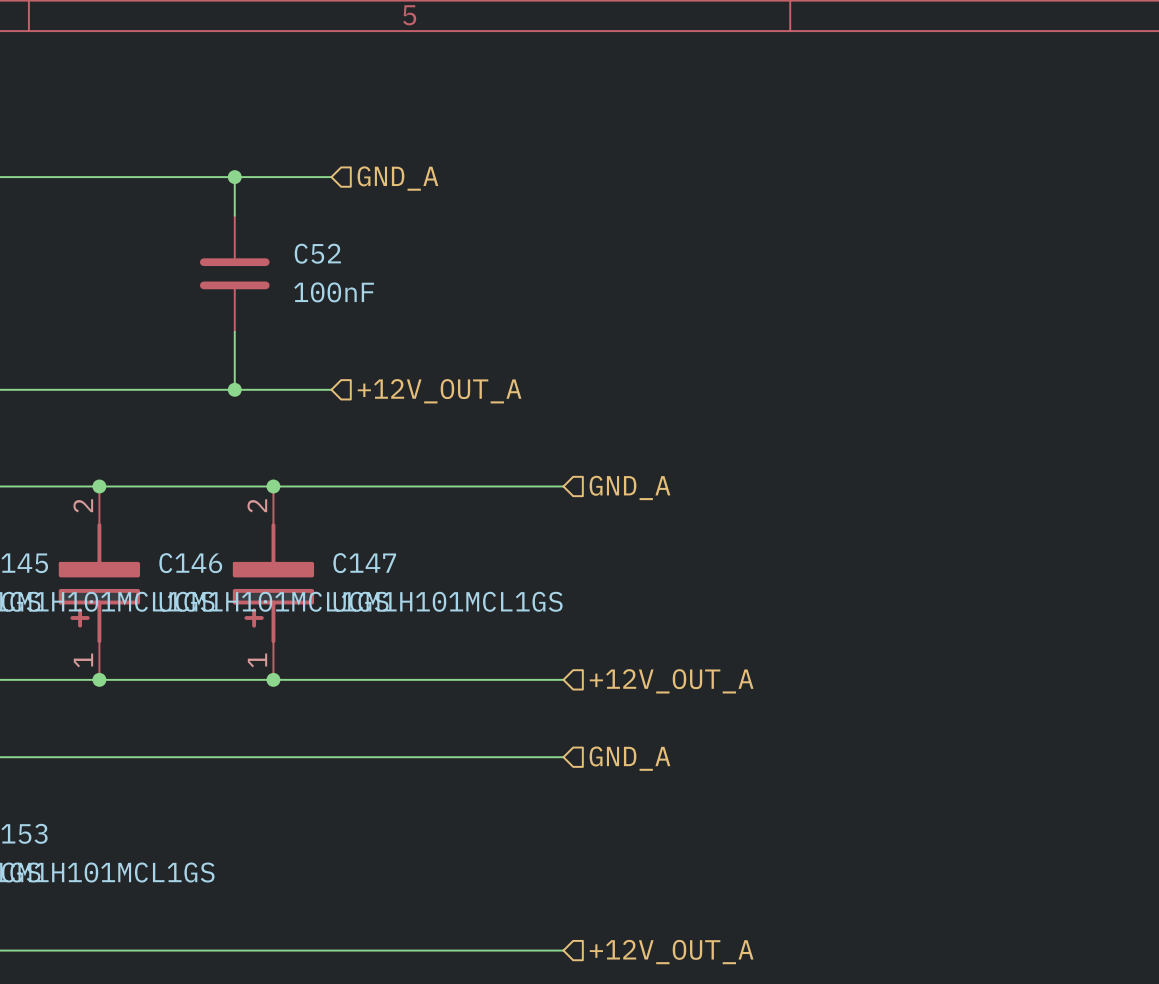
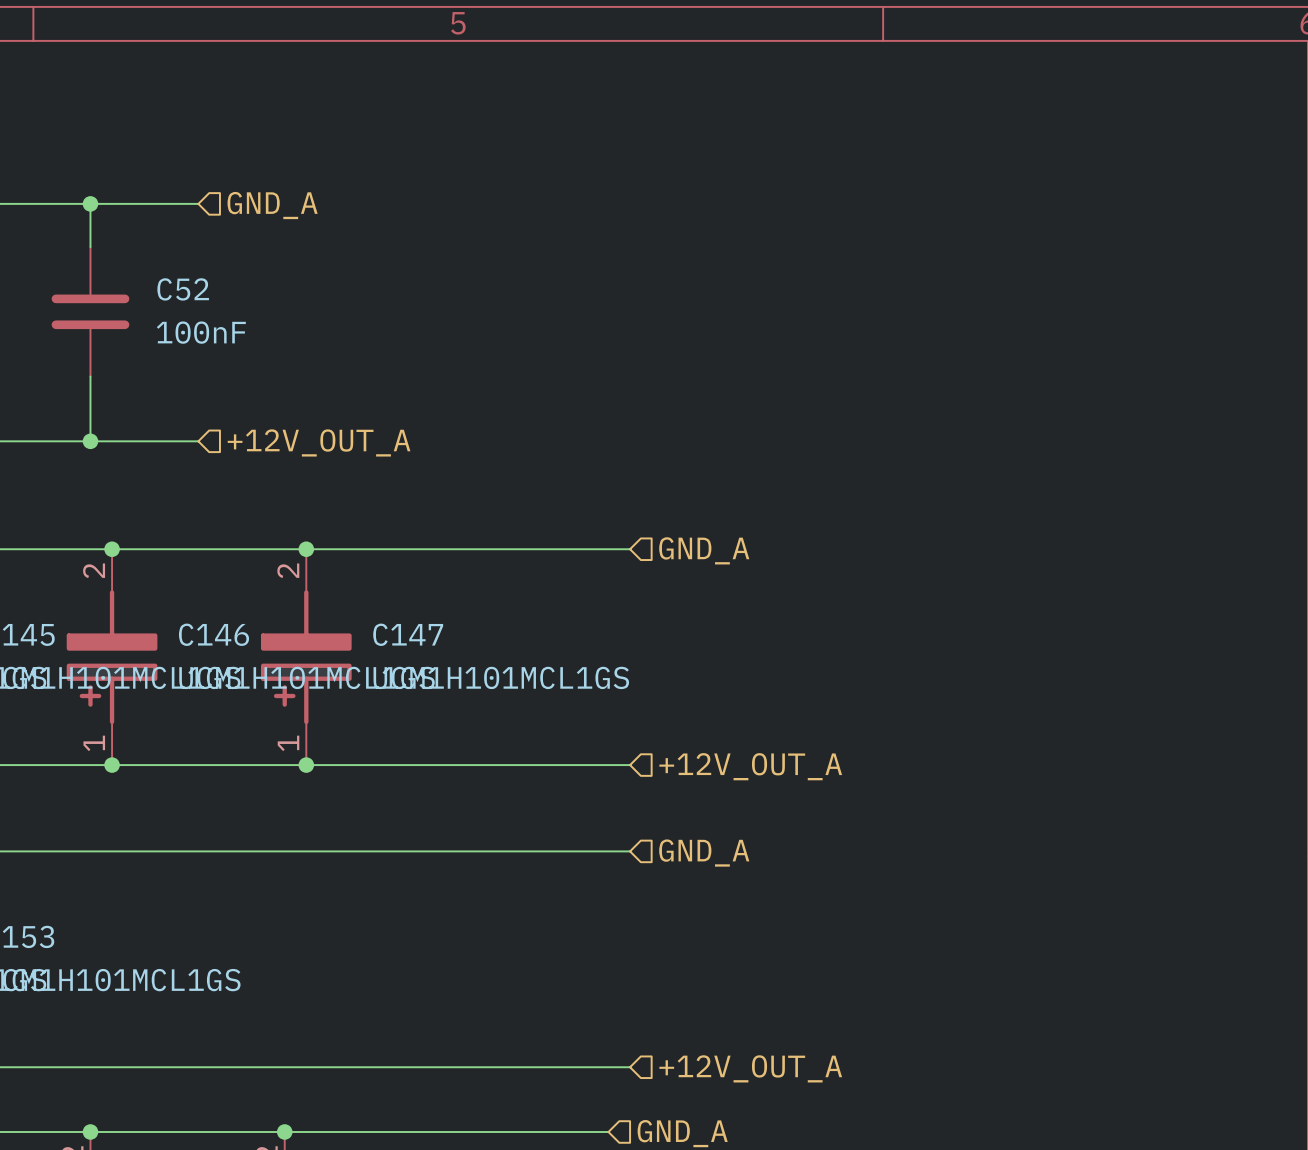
junction: none -> (90, 203)
wire: (176, 177) (331, 177) -> none
wire: (234, 177) (234, 215) -> (90, 203) (90, 247)
junction: (234, 177) -> none
hierarchical label position: GND_A (397, 178) -> GND_A (272, 205)
C52 position: (234, 273) -> (90, 311)
wire: (234, 331) (234, 389) -> (90, 376) (90, 441)
junction: none -> (90, 441)
wire: (176, 389) (331, 389) -> none
junction: (234, 389) -> none
hierarchical label position: +12V_OUT_A (439, 391) -> +12V_OUT_A (319, 442)

